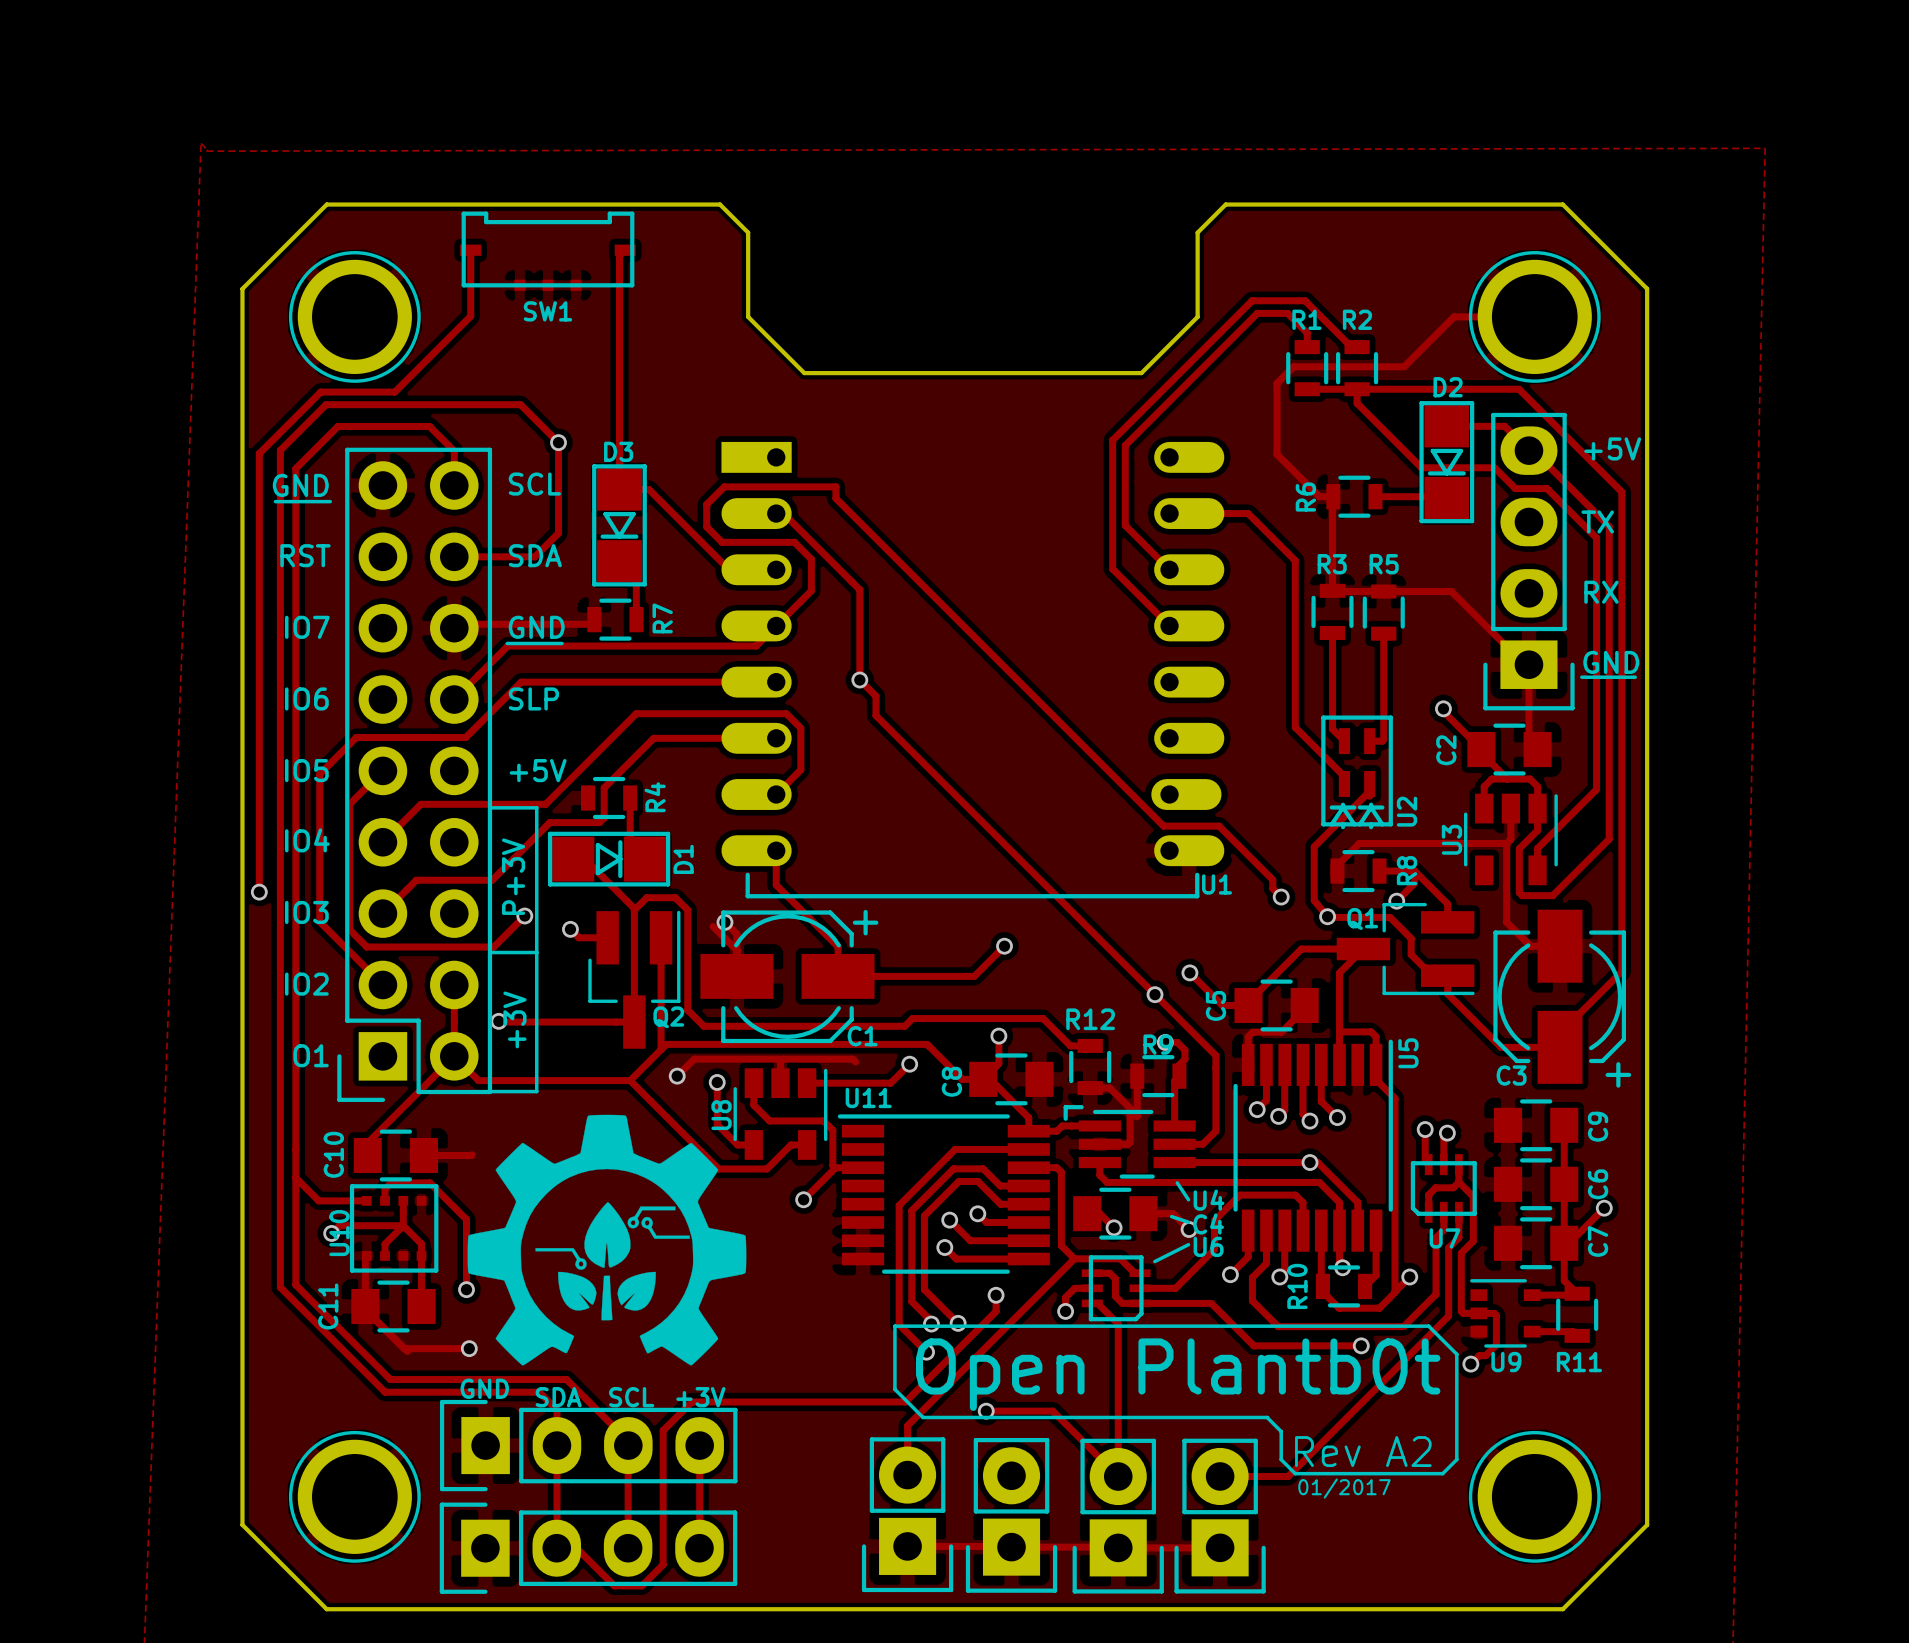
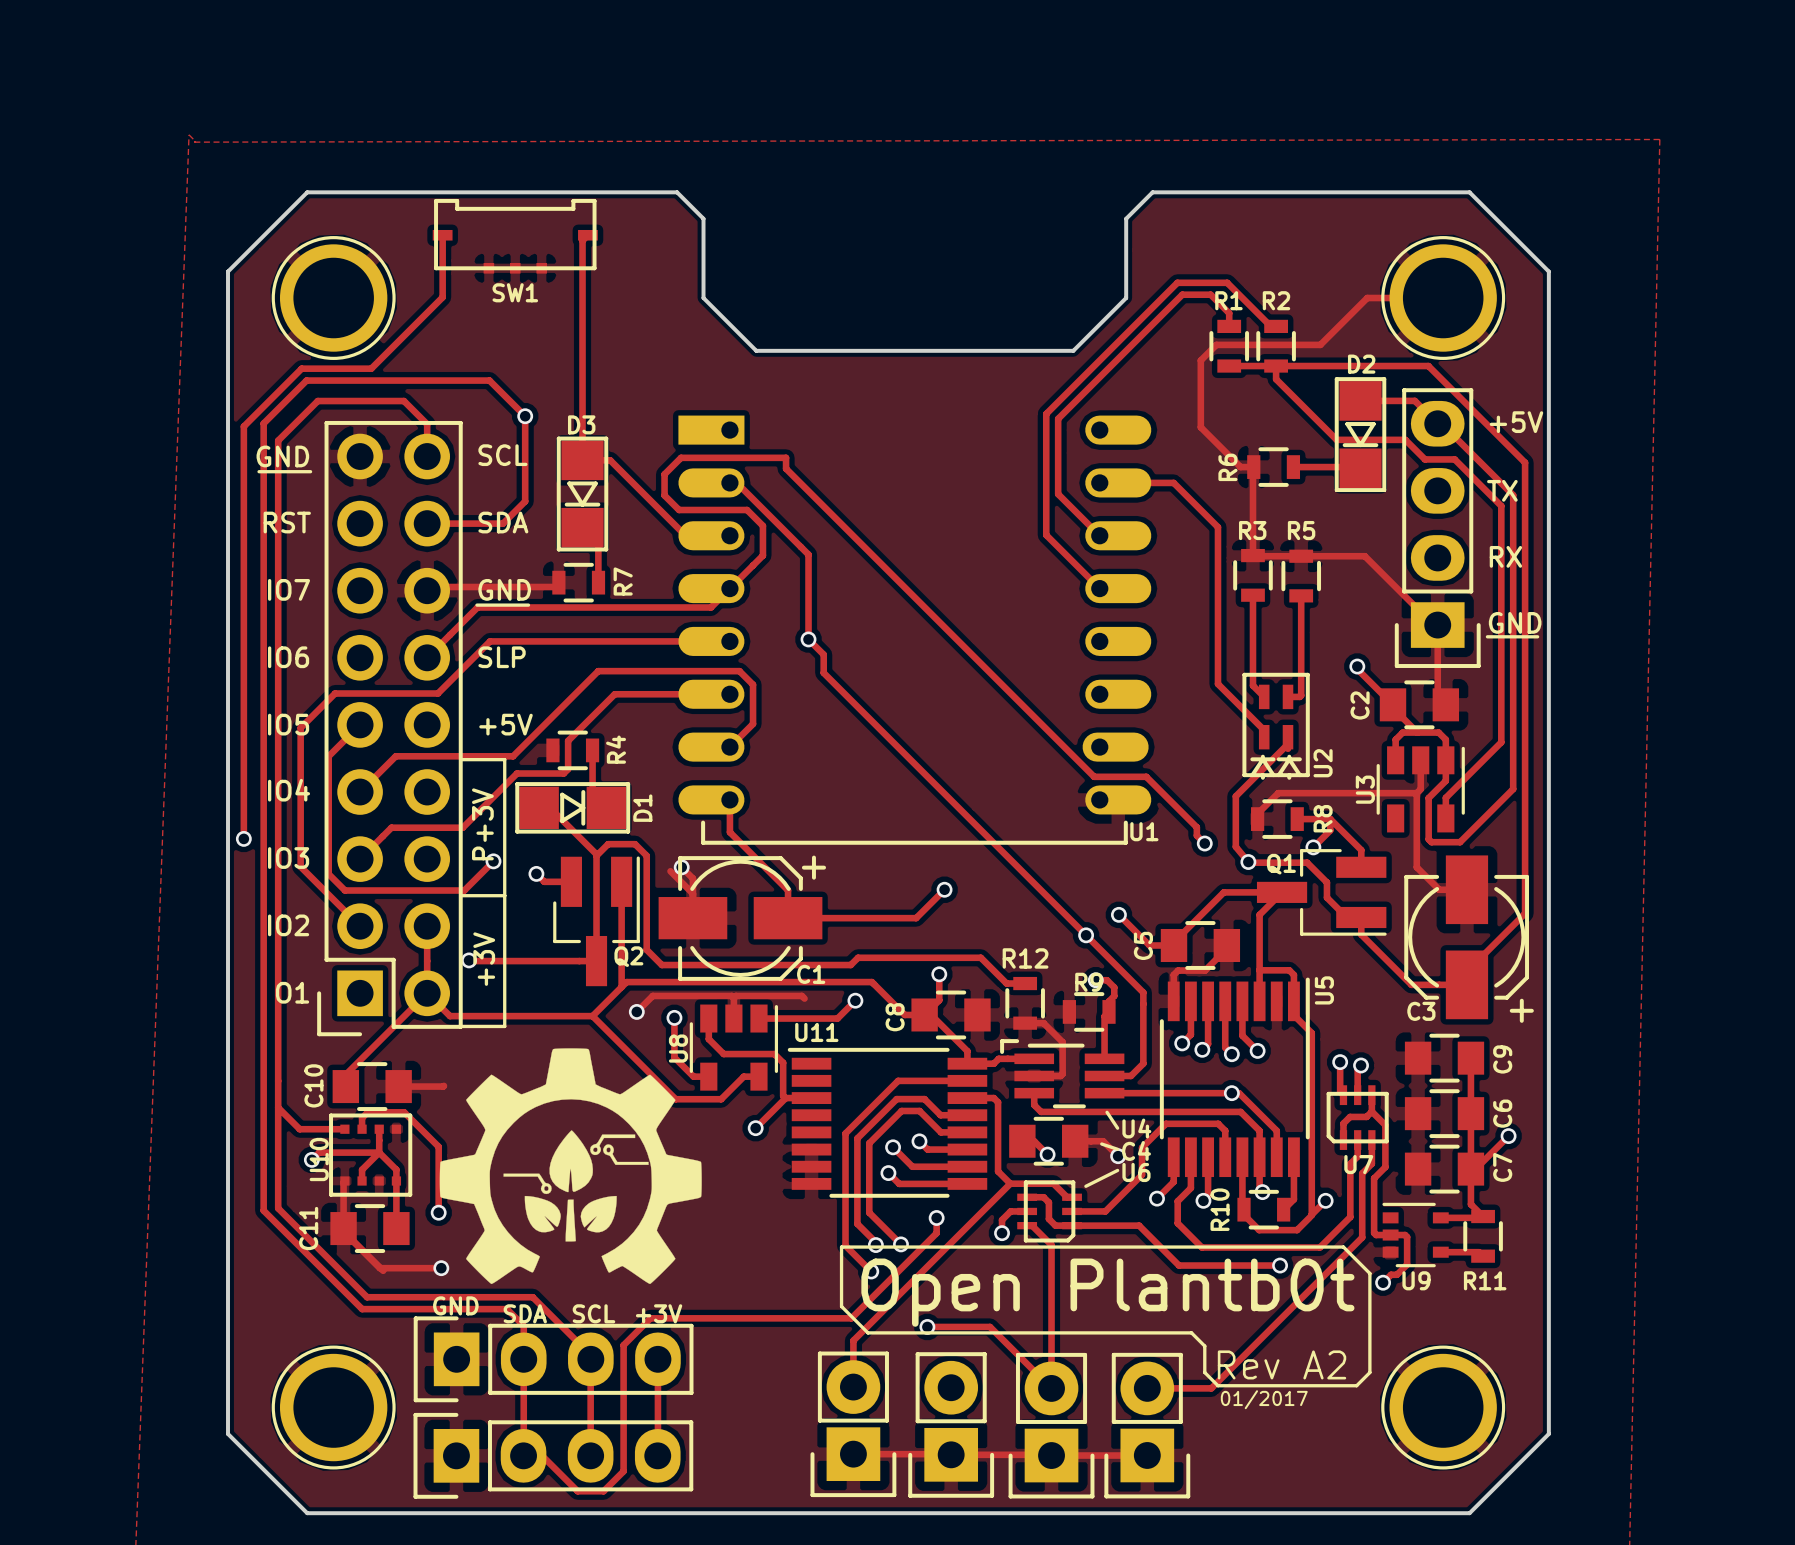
track: (1137, 1076) (1136, 1116) -> none

